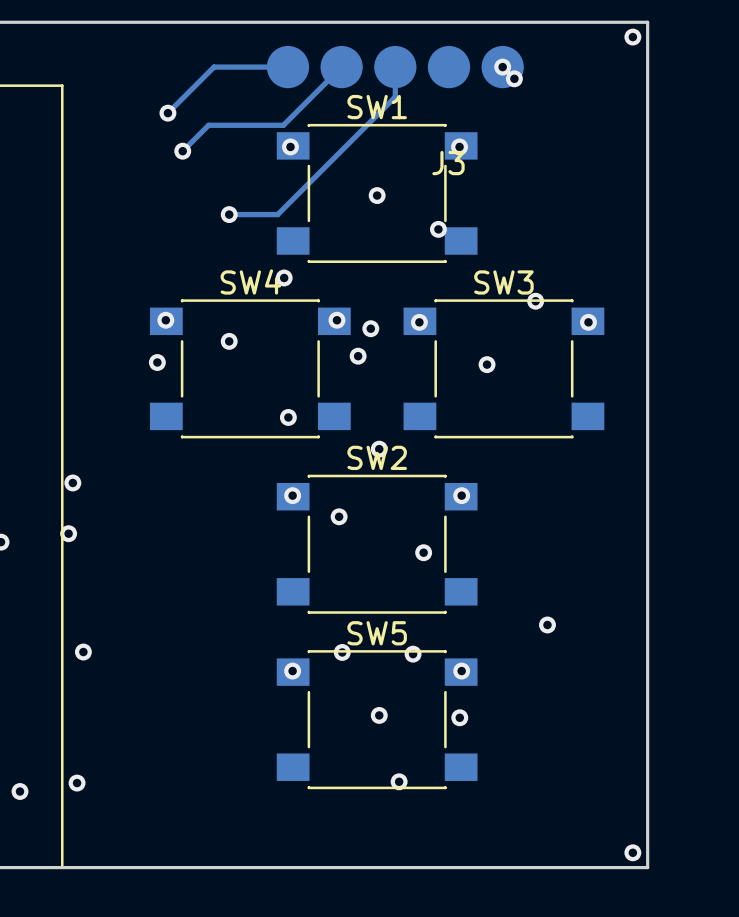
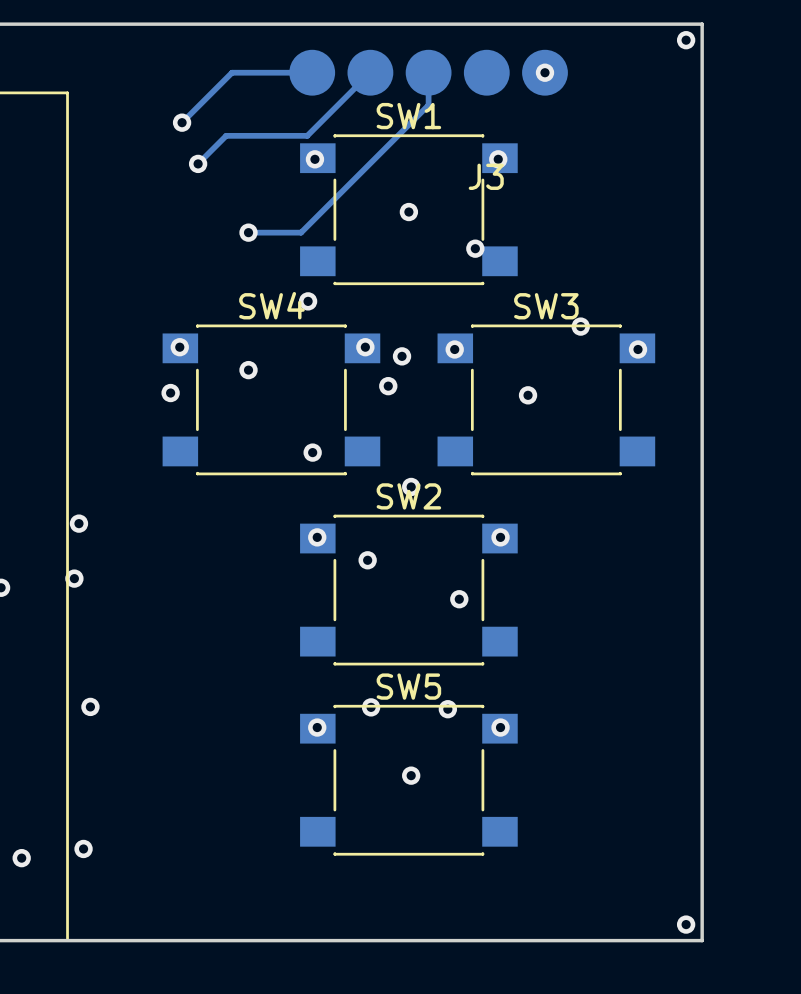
via: (514, 78) -> none
via: (547, 624) -> none
via: (459, 717) -> none
via: (399, 781) -> none

